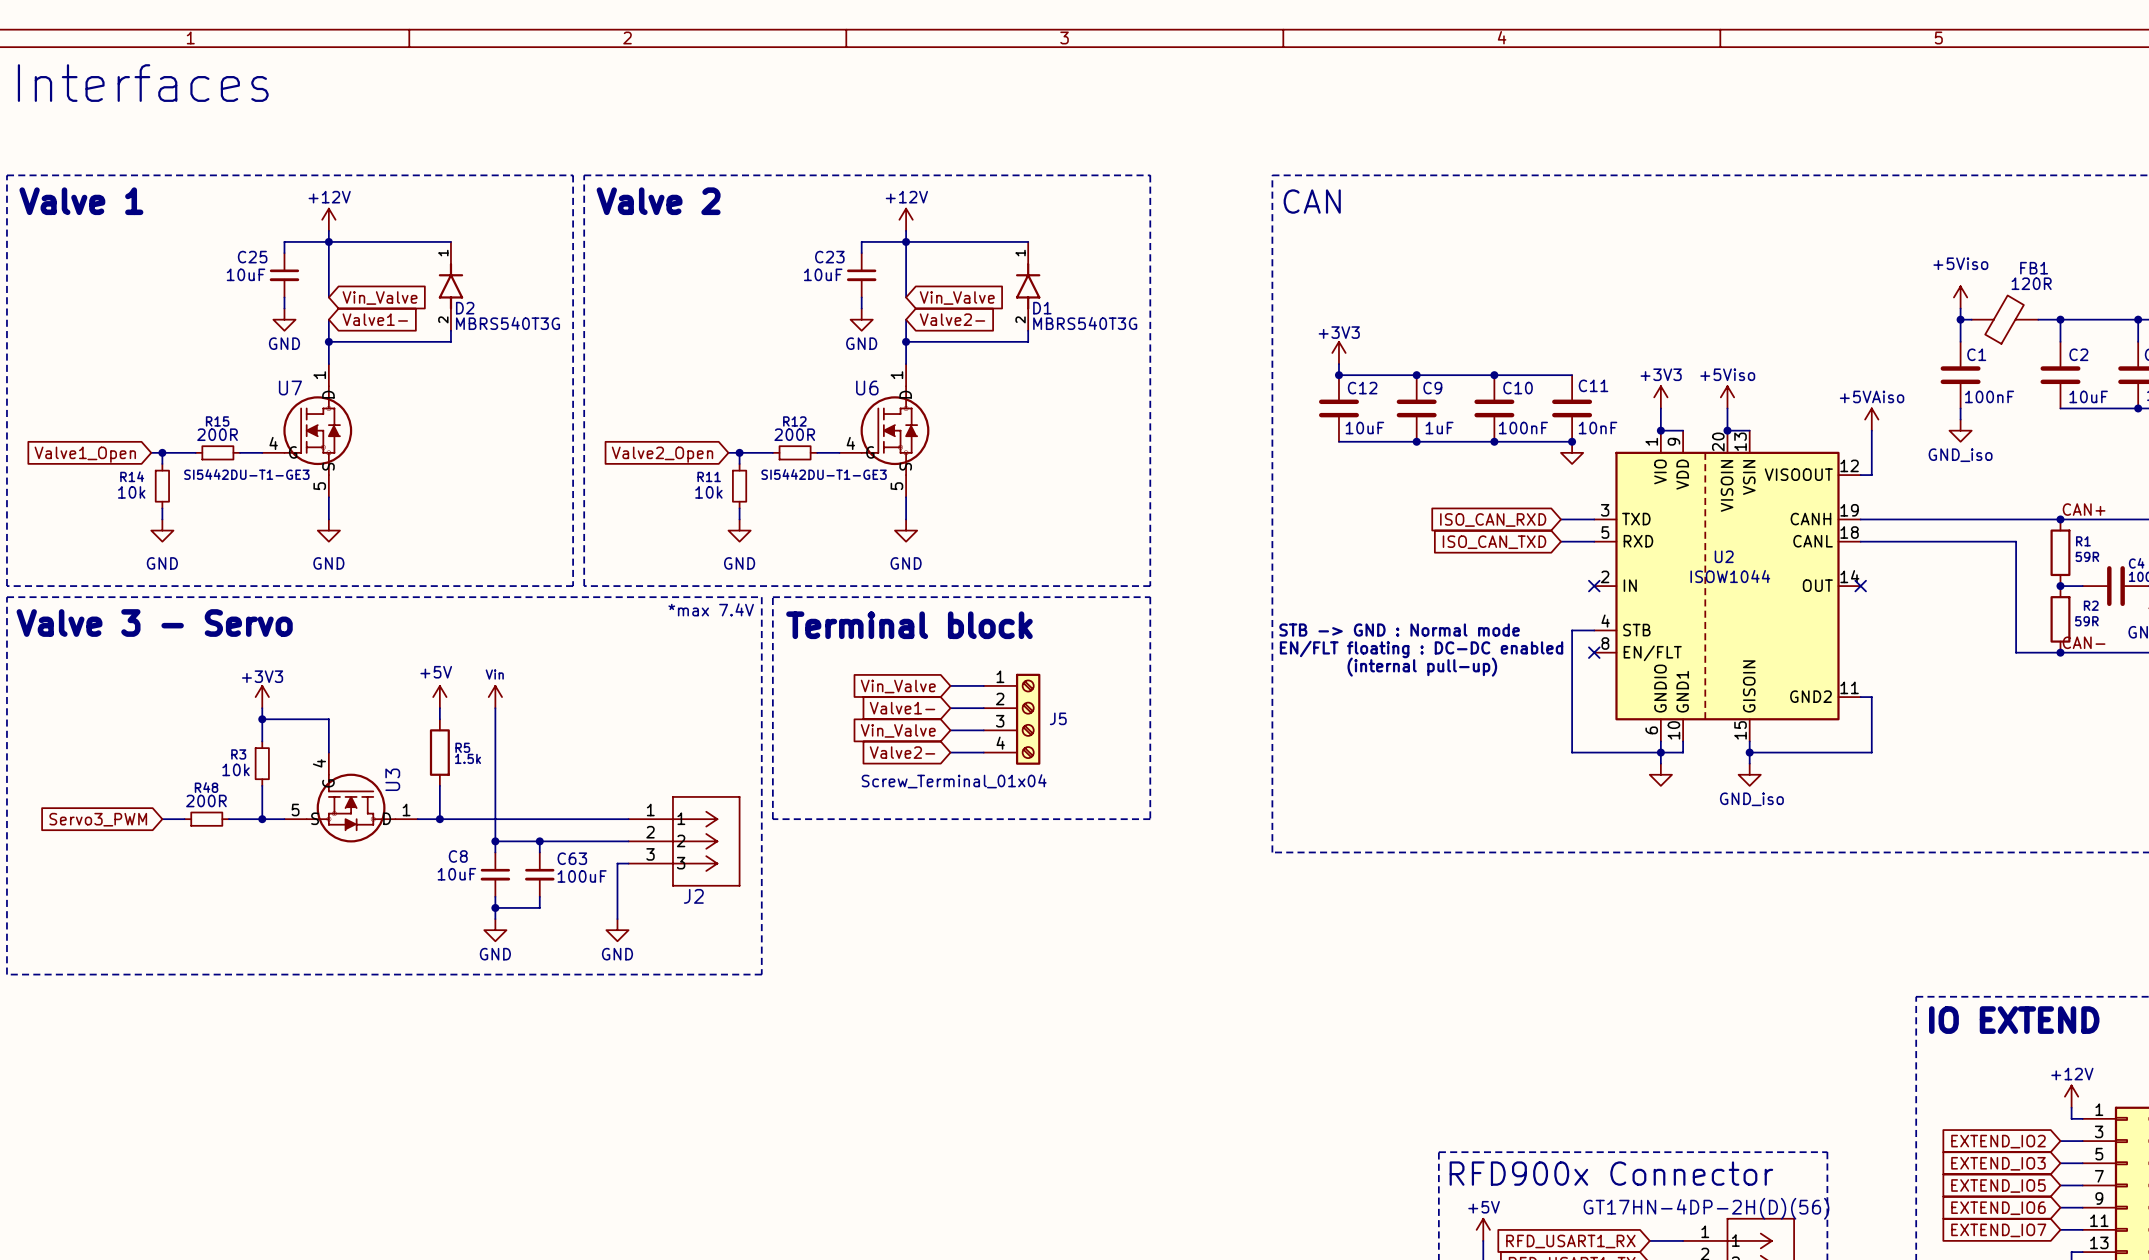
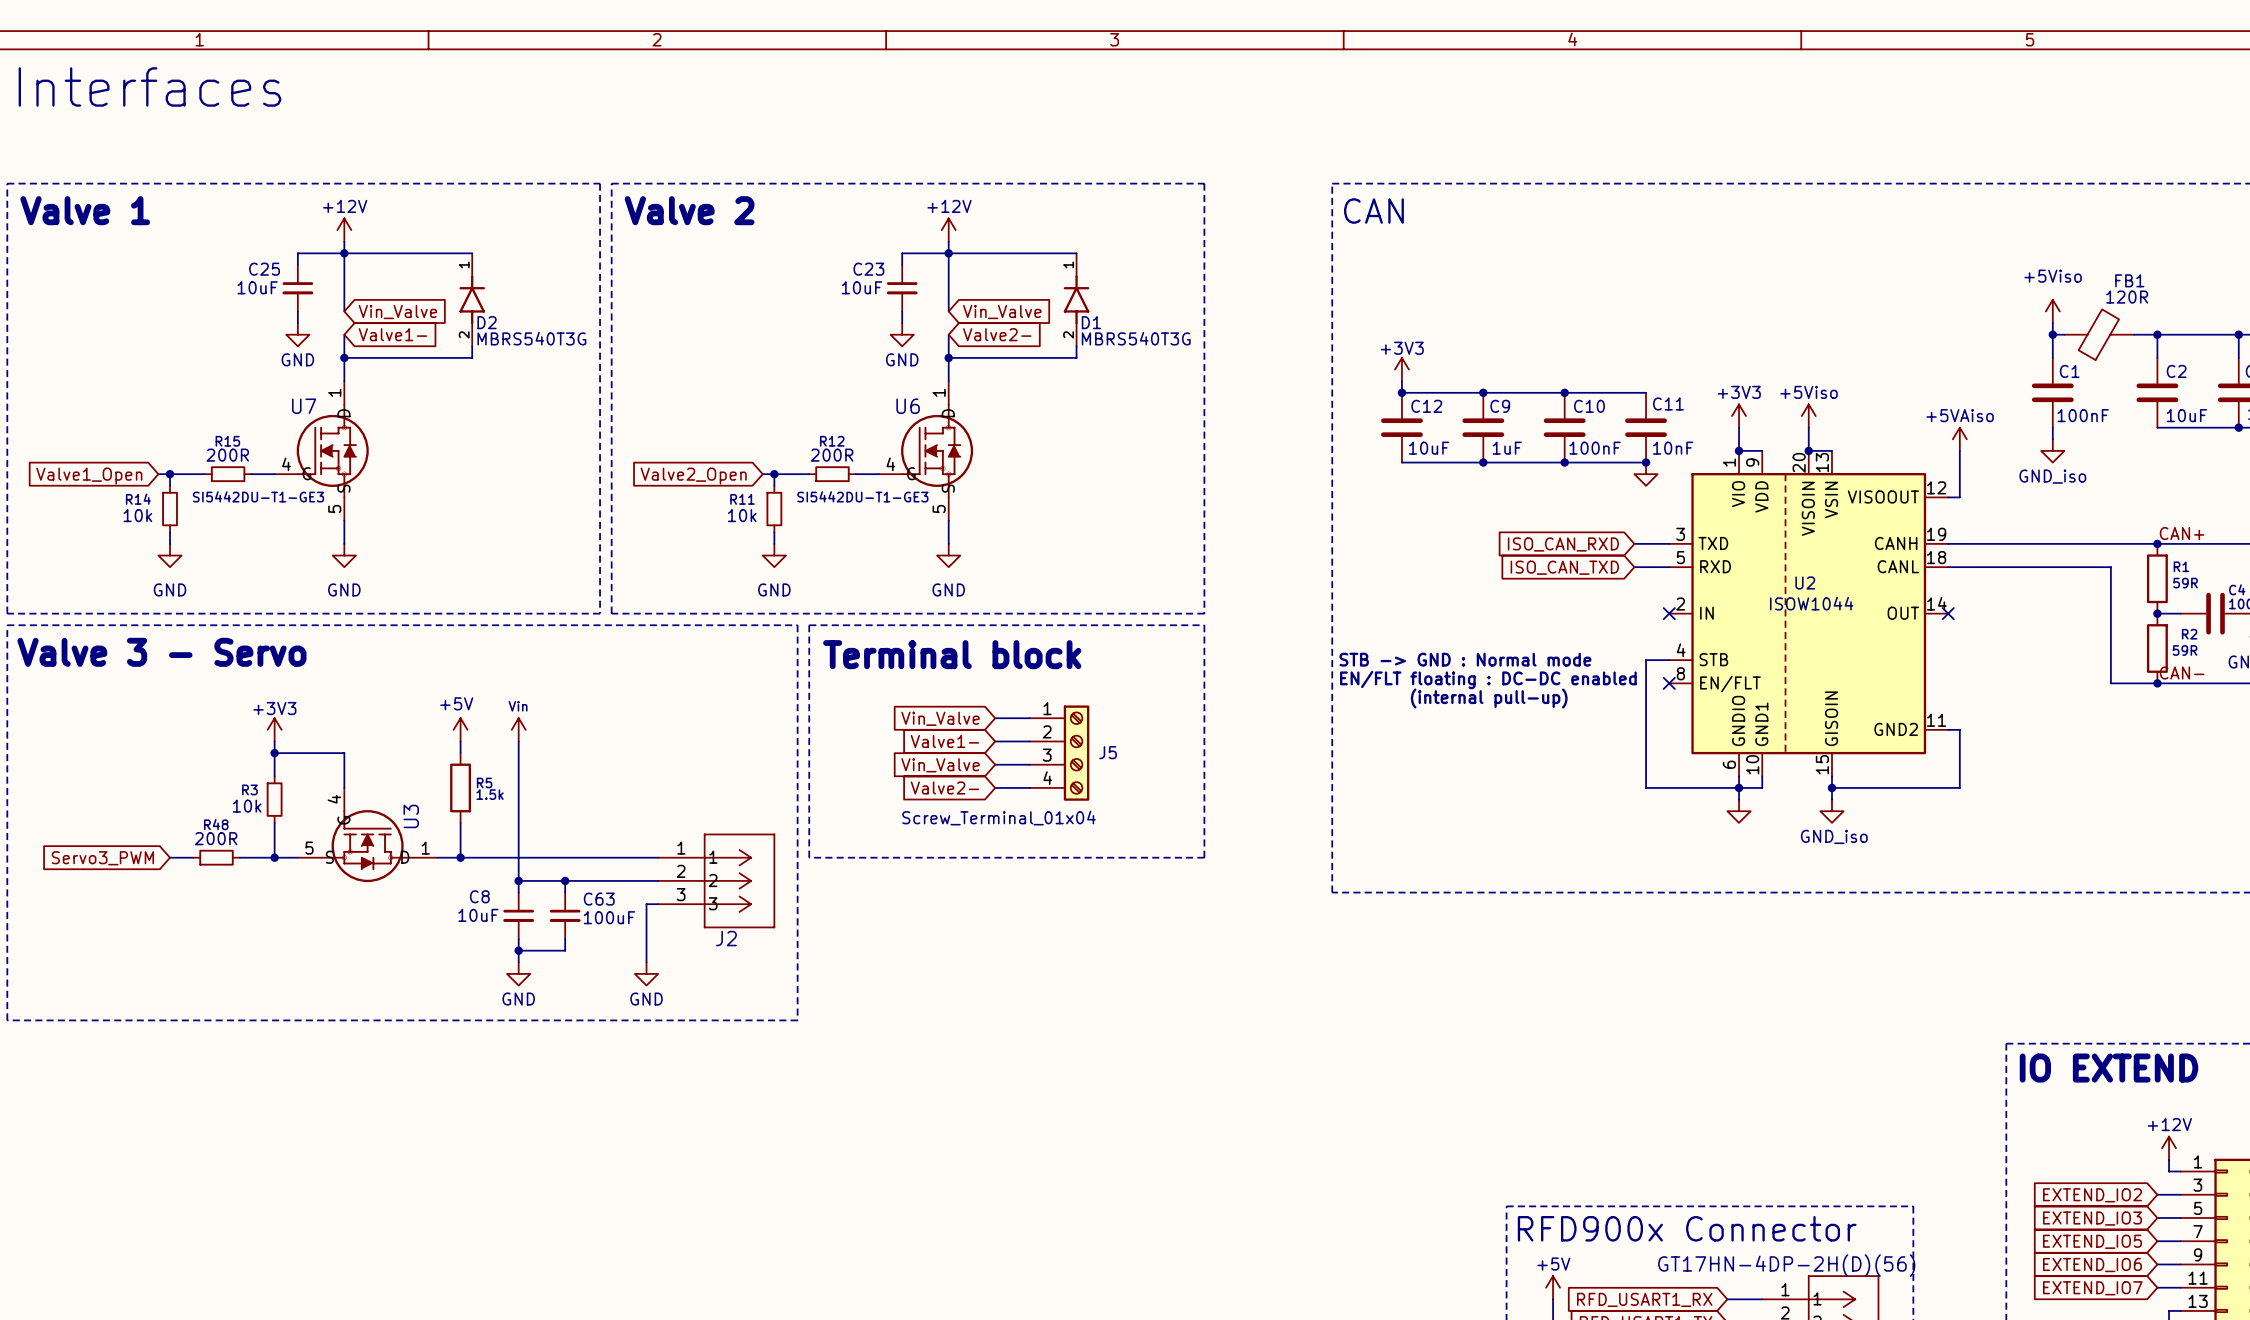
text: *max 7.4V (711, 609) -> none

